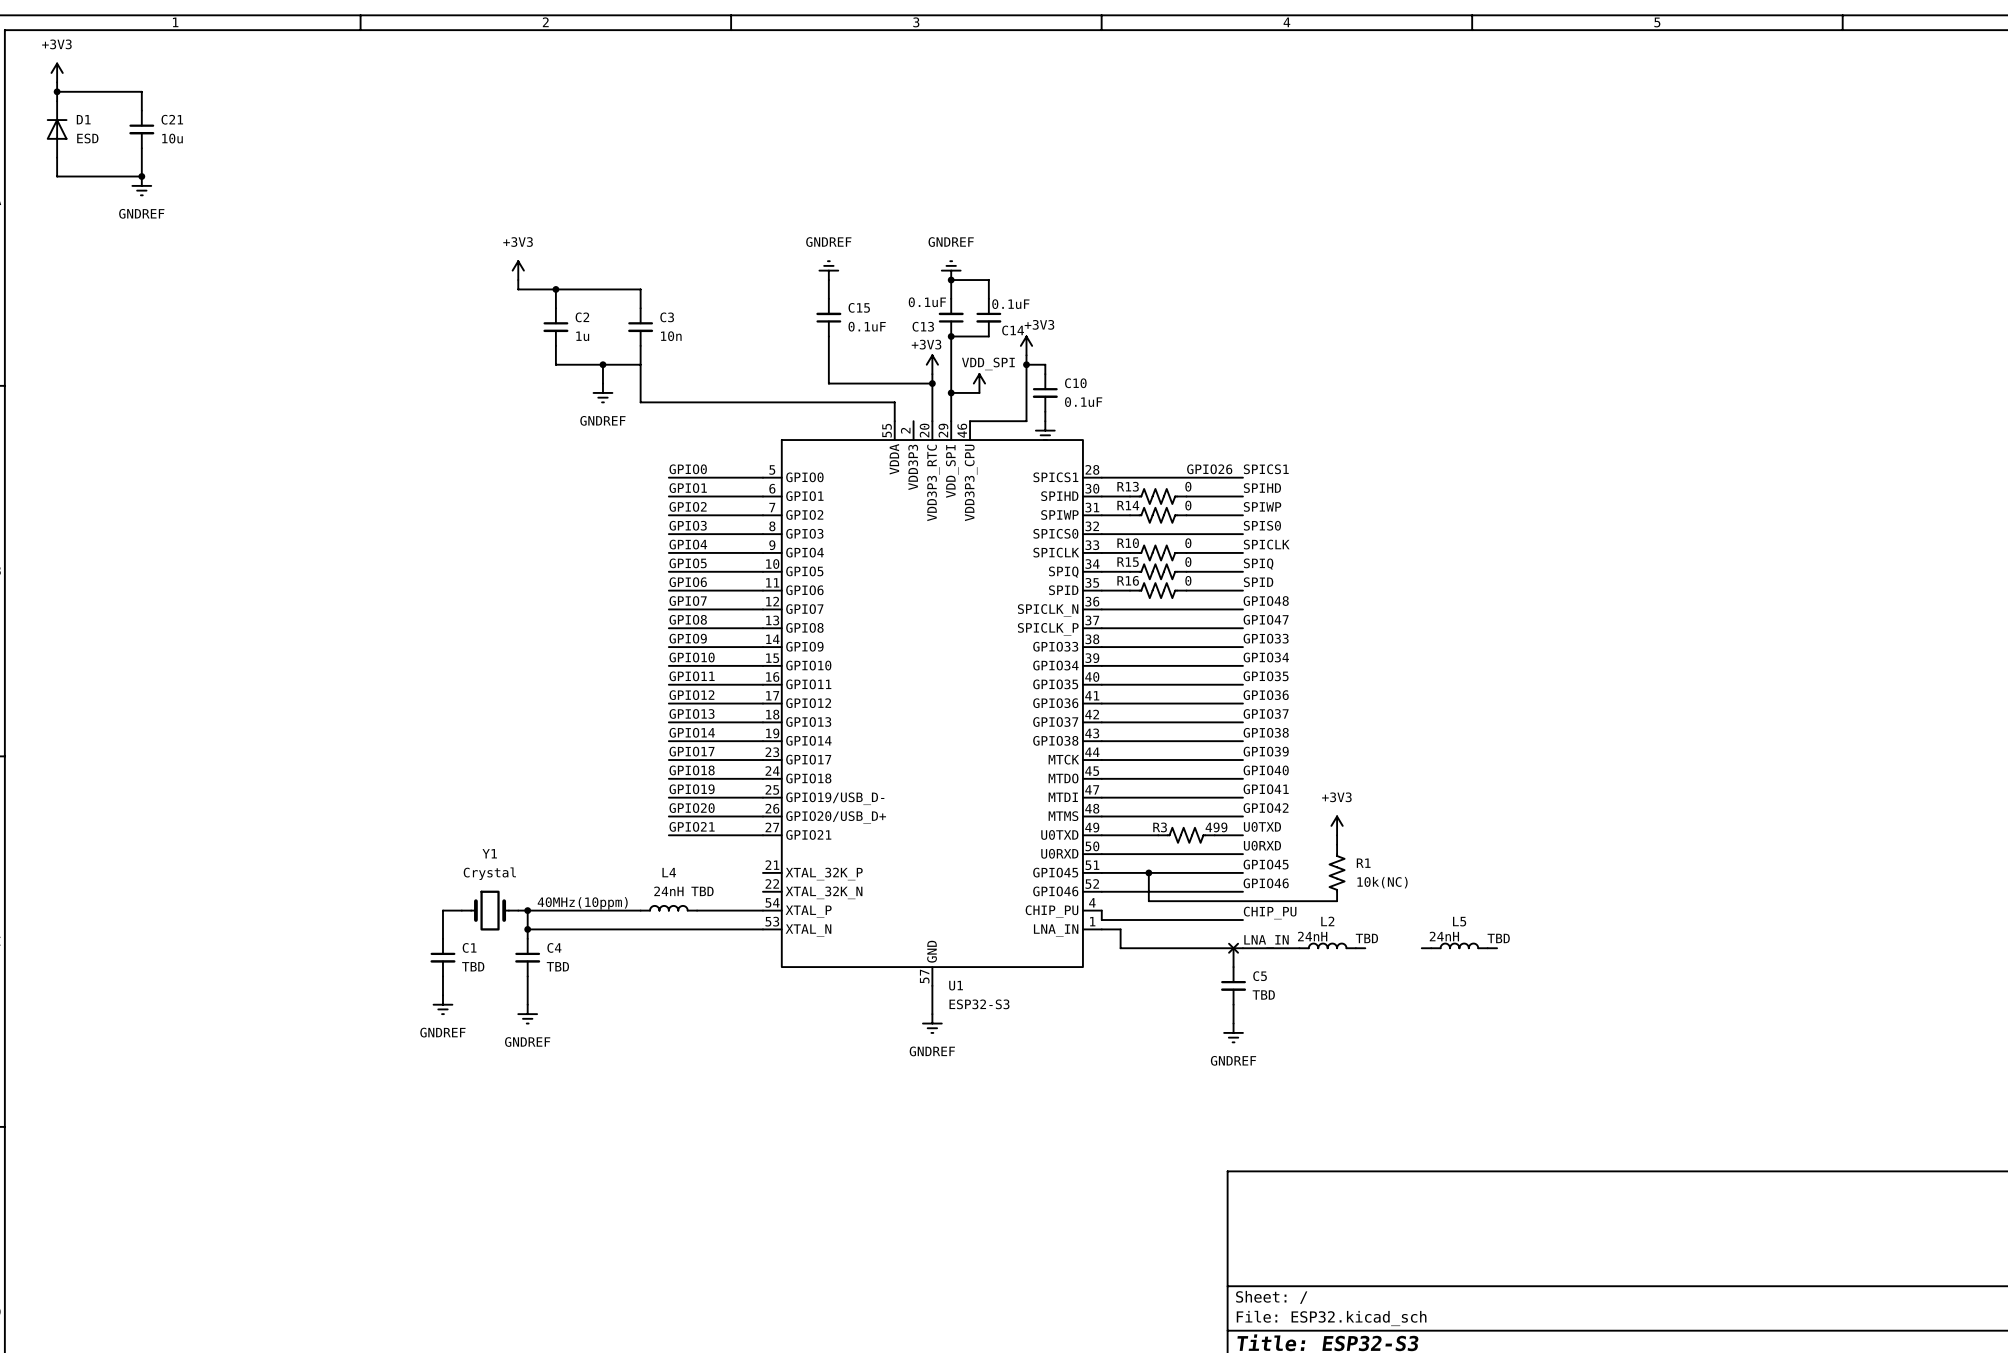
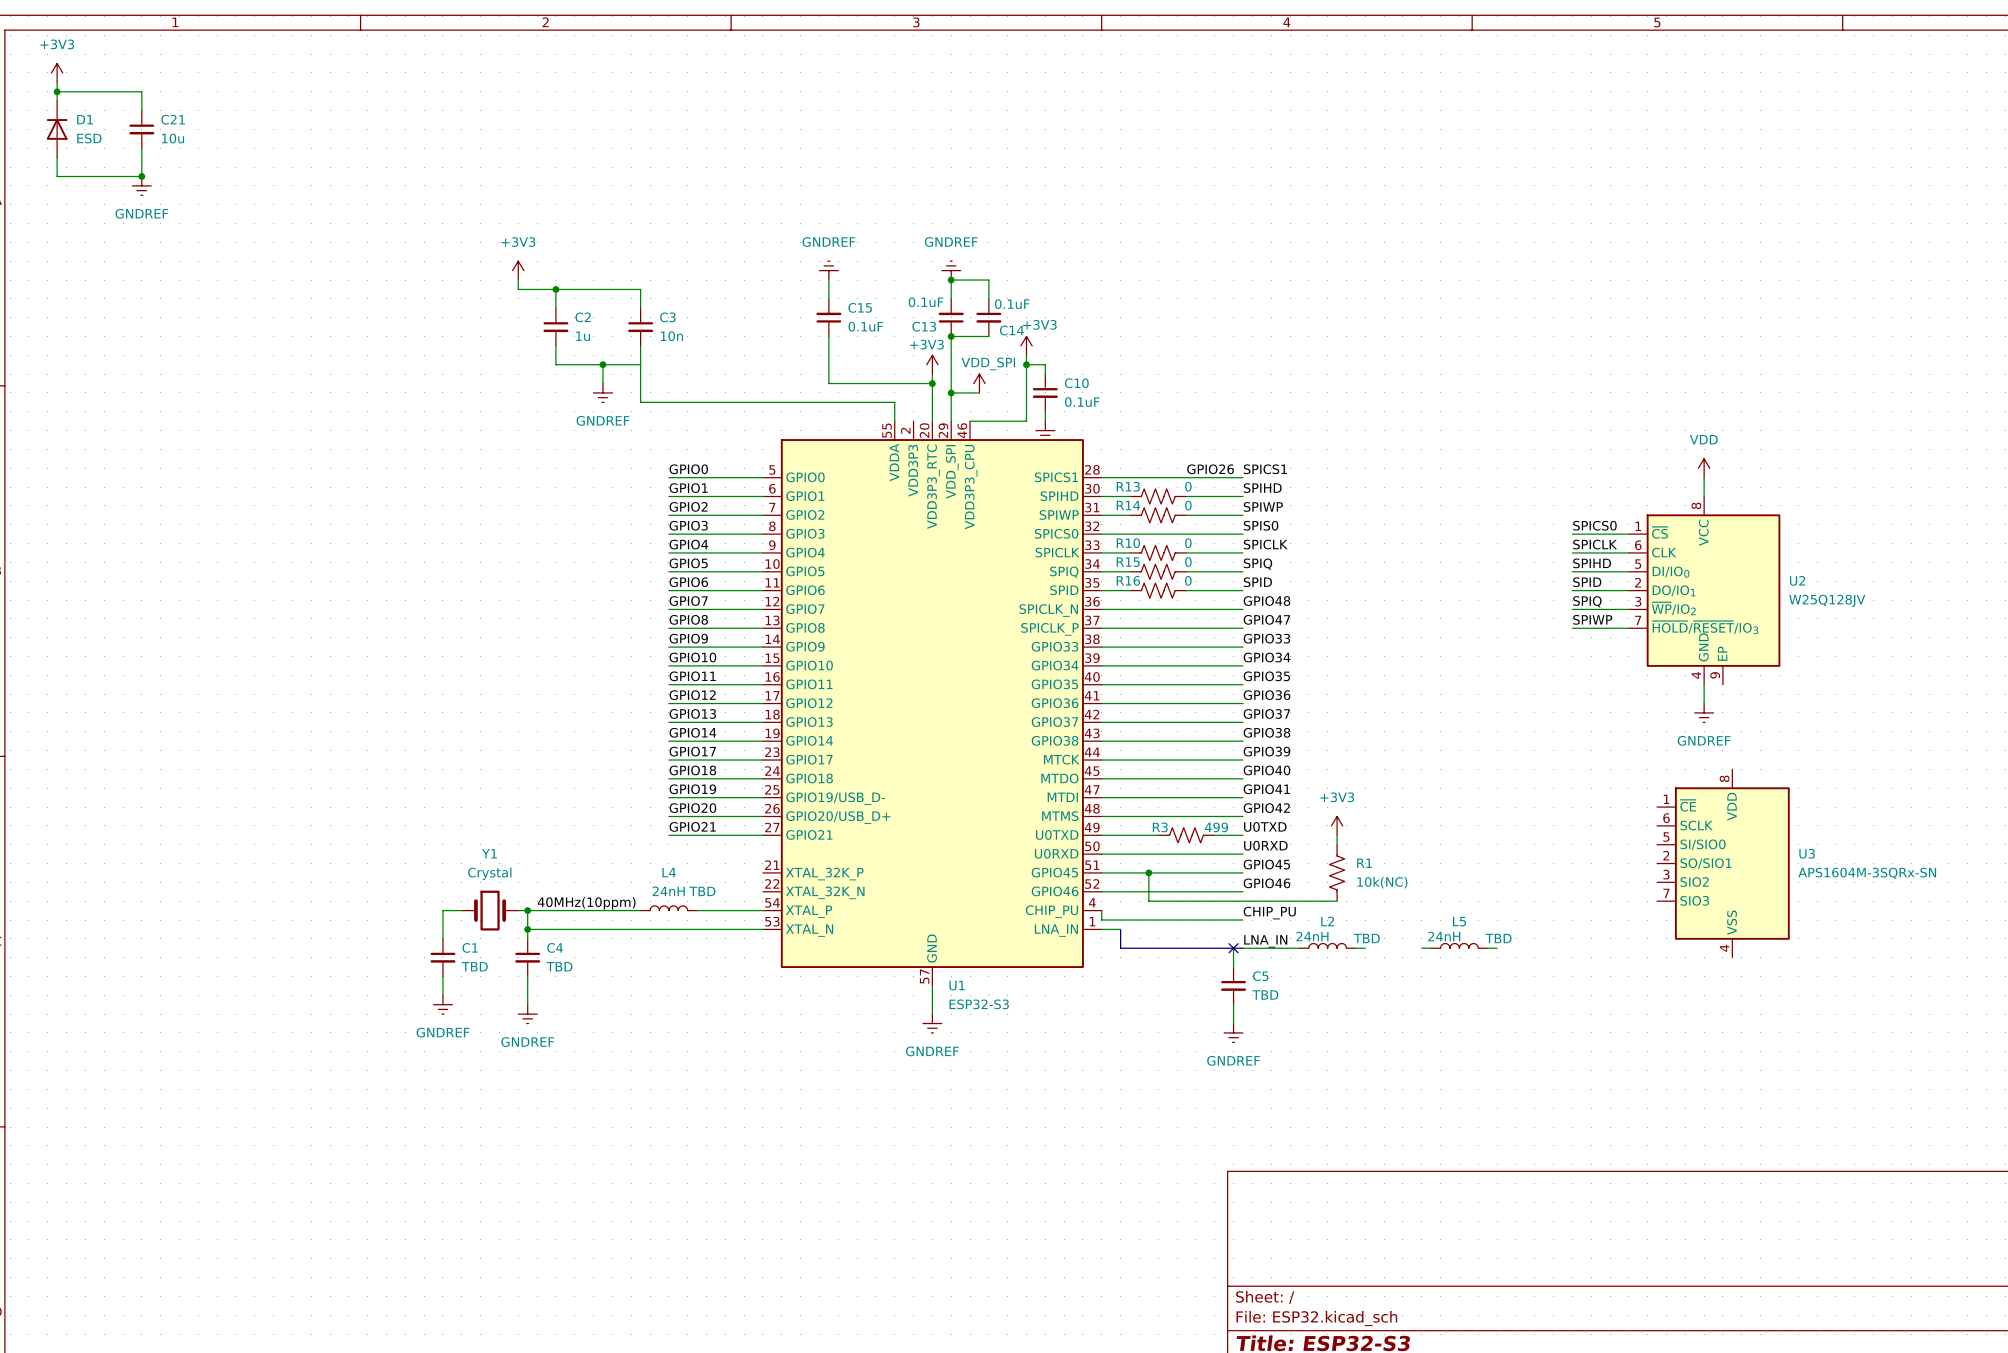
power symbol: none -> VDD (1704, 468)
wire: none -> (1704, 477) (1704, 496)
label: none -> SPICS0 (1594, 525)
wire: none -> (1572, 534) (1628, 534)
label: none -> SPICLK (1595, 544)
wire: none -> (1572, 552) (1628, 552)
label: none -> SPIHD (1592, 563)
wire: none -> (1572, 571) (1628, 571)
label: none -> SPID (1587, 582)
wire: none -> (1572, 590) (1628, 590)
U2: none -> W25Q128JV (1704, 590)
label: none -> SPIQ (1587, 601)
wire: none -> (1572, 609) (1628, 609)
label: none -> SPIWP (1592, 619)
wire: none -> (1572, 628) (1628, 628)
wire: none -> (1704, 684) (1704, 703)
power symbol: none -> GNDREF (1704, 712)
U3: none -> APS1604M-3SQRx-SN (1723, 863)

